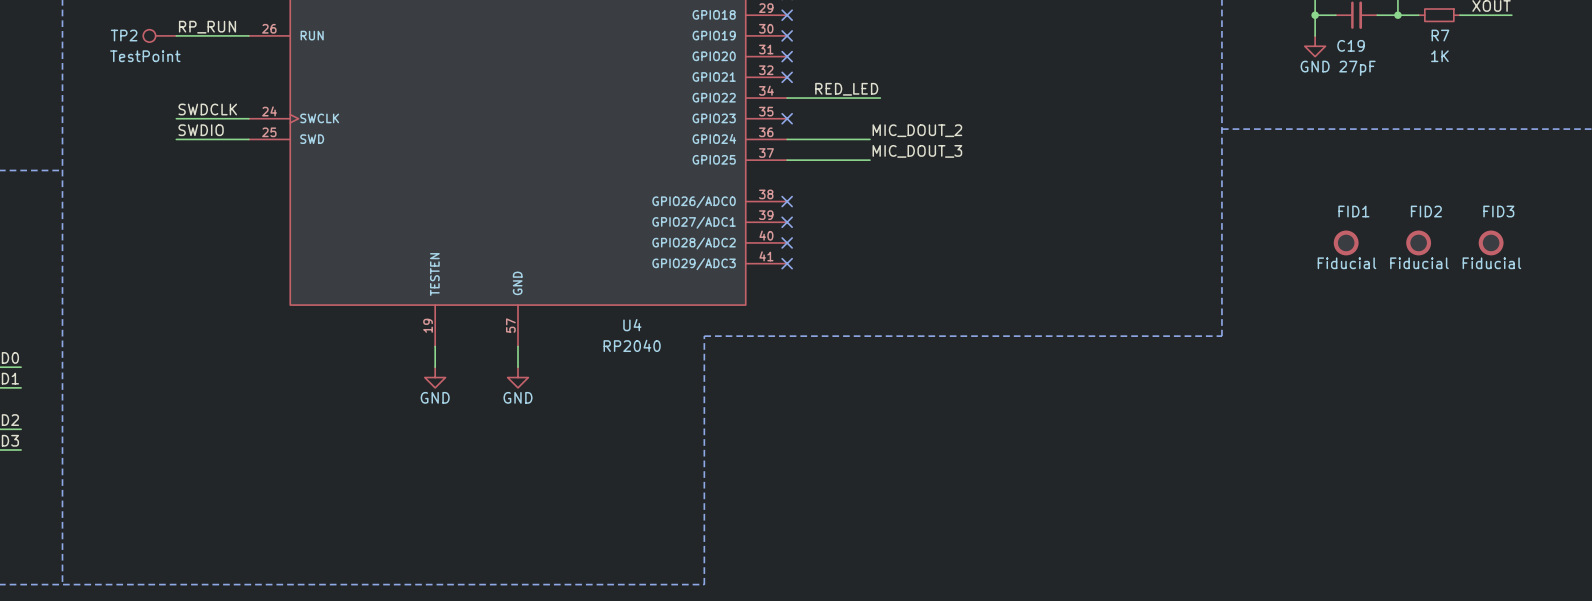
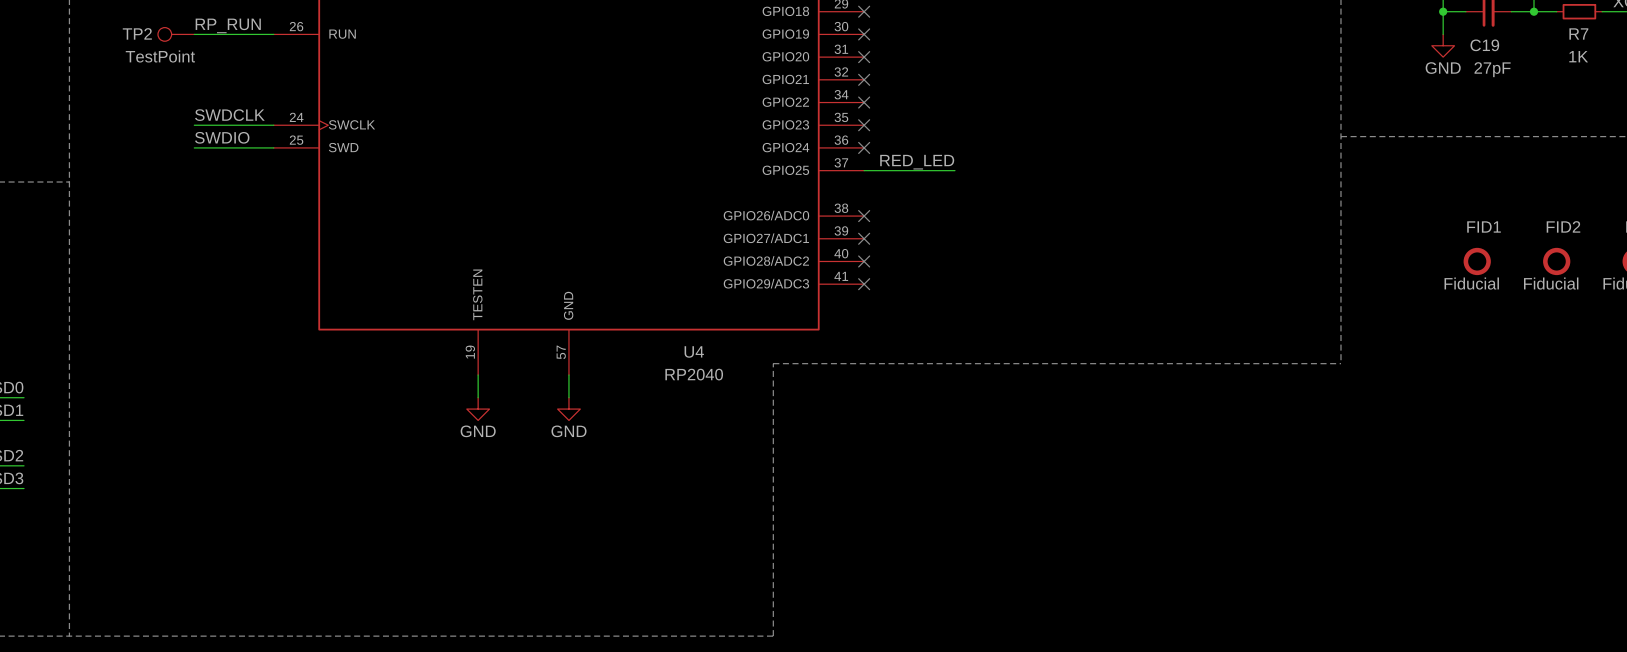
label: RED_LED (846, 89) -> none
wire: (787, 98) (880, 98) -> none
no-connect mark: none -> (864, 102)
label: MIC_DOUT_2 (917, 130) -> none
wire: (787, 139) (869, 139) -> none
no-connect mark: none -> (864, 147)
label: MIC_DOUT_3 (917, 151) -> RED_LED (917, 162)

